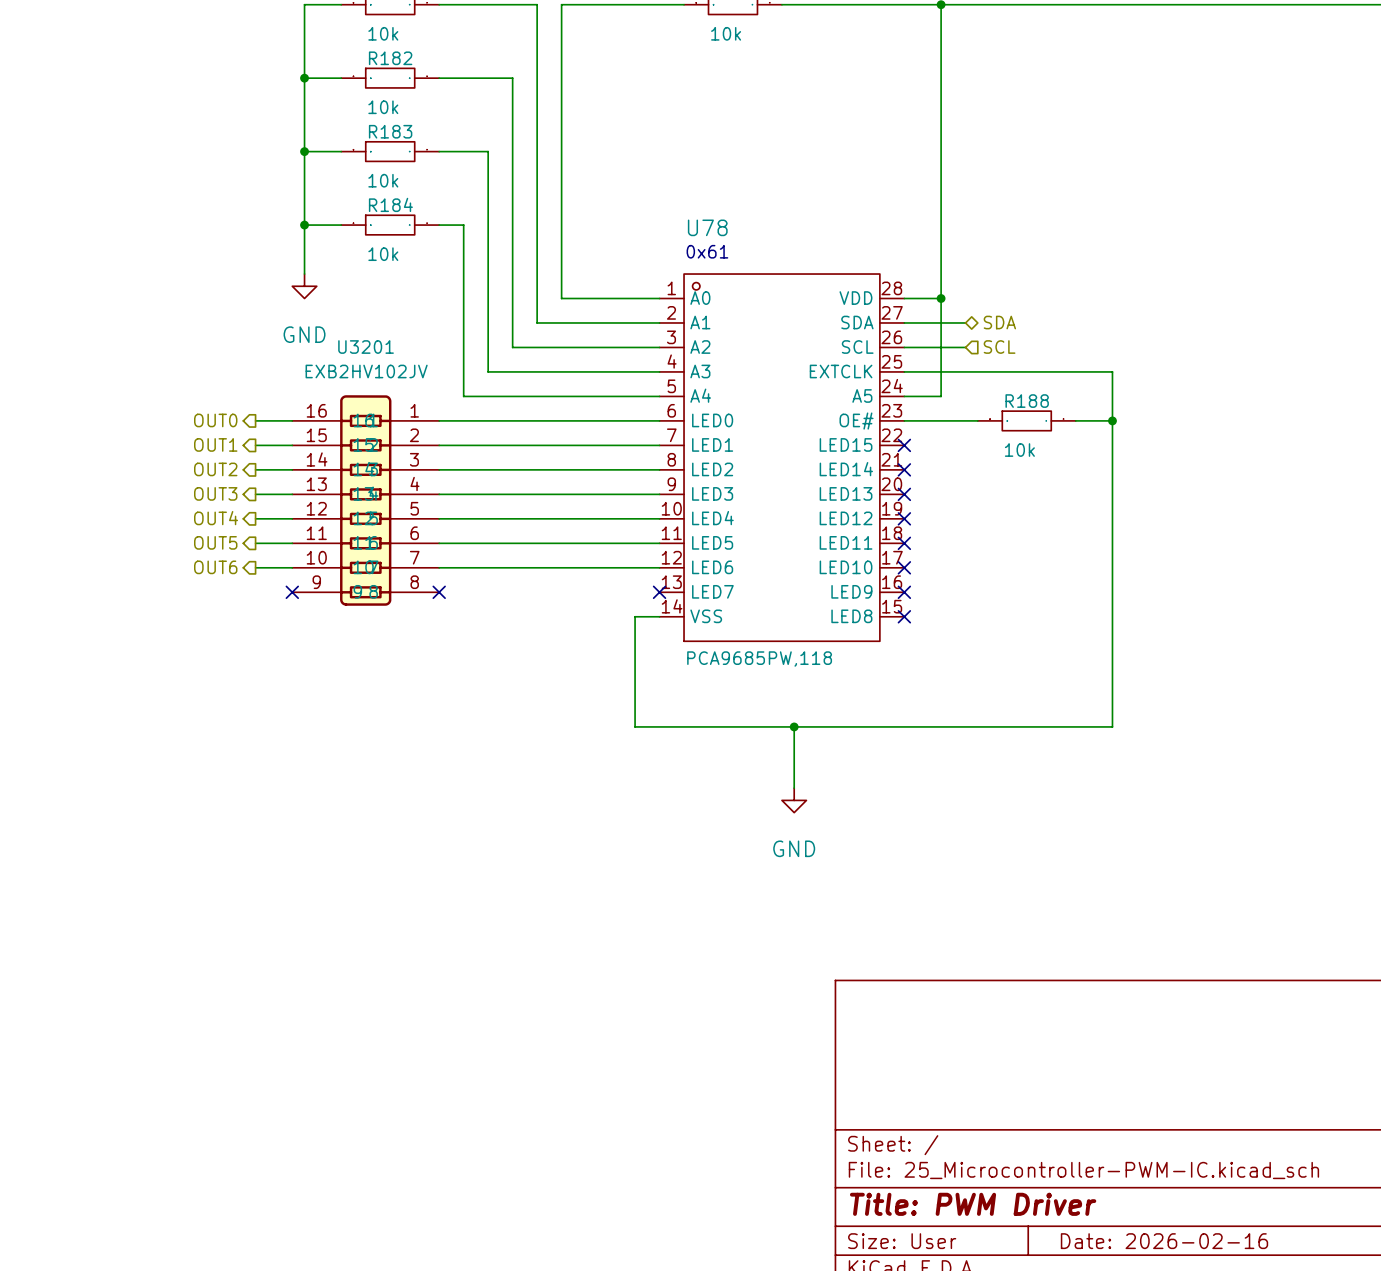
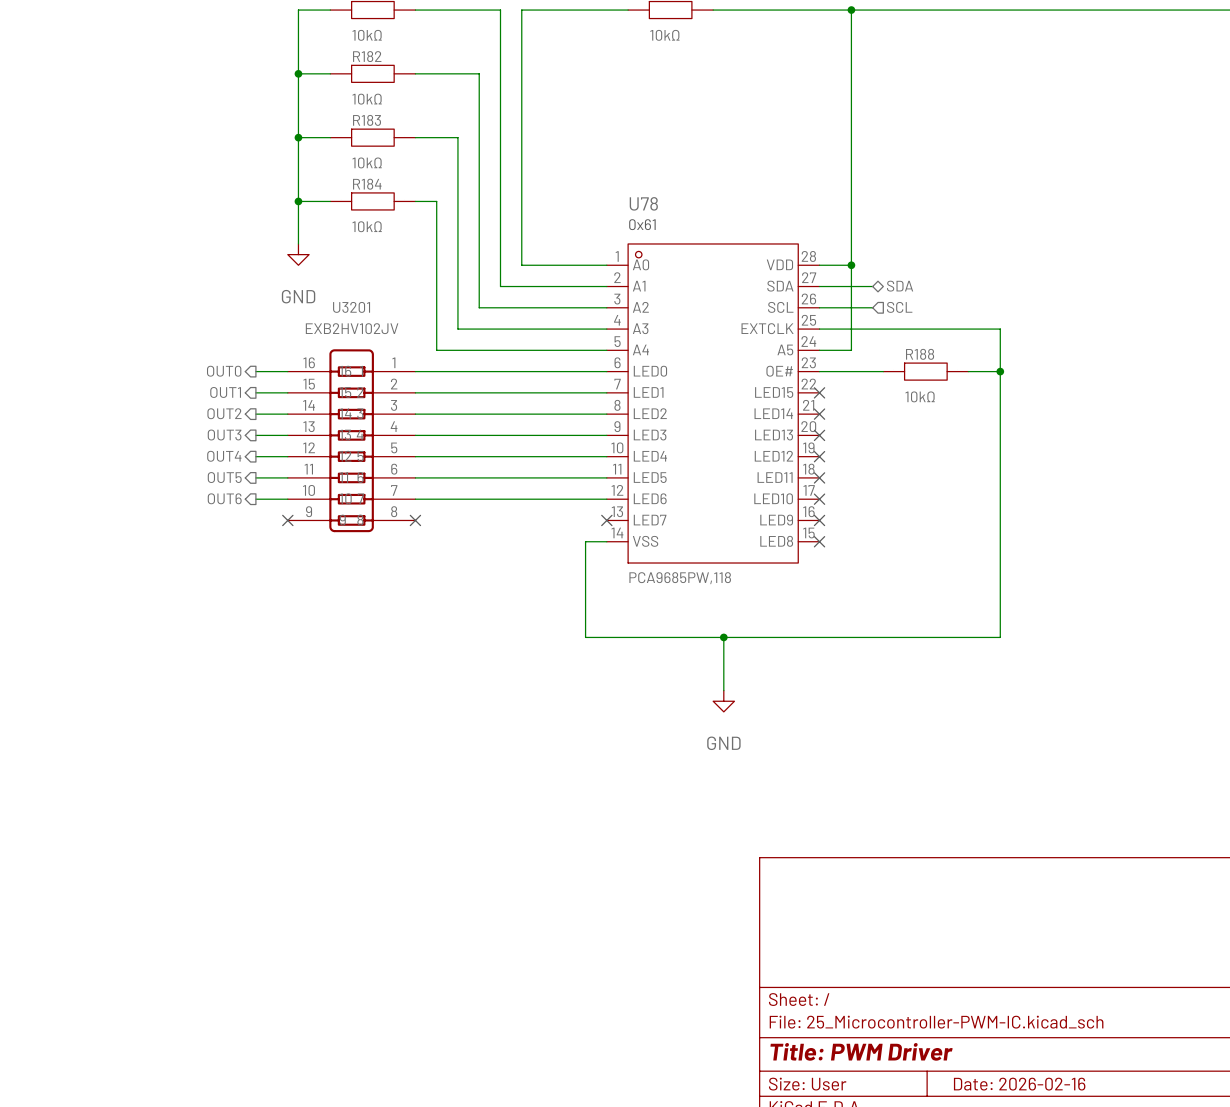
part value: 10k (383, 33) -> 10kΩ (367, 35)
part value: 10k (726, 33) -> 10kΩ (664, 35)
R182 value: 10k (383, 107) -> 10kΩ (367, 99)
R183 value: 10k (383, 180) -> 10kΩ (367, 162)
R184 value: 10k (383, 254) -> 10kΩ (367, 226)
R188 value: 10k (1019, 450) -> 10kΩ (920, 396)

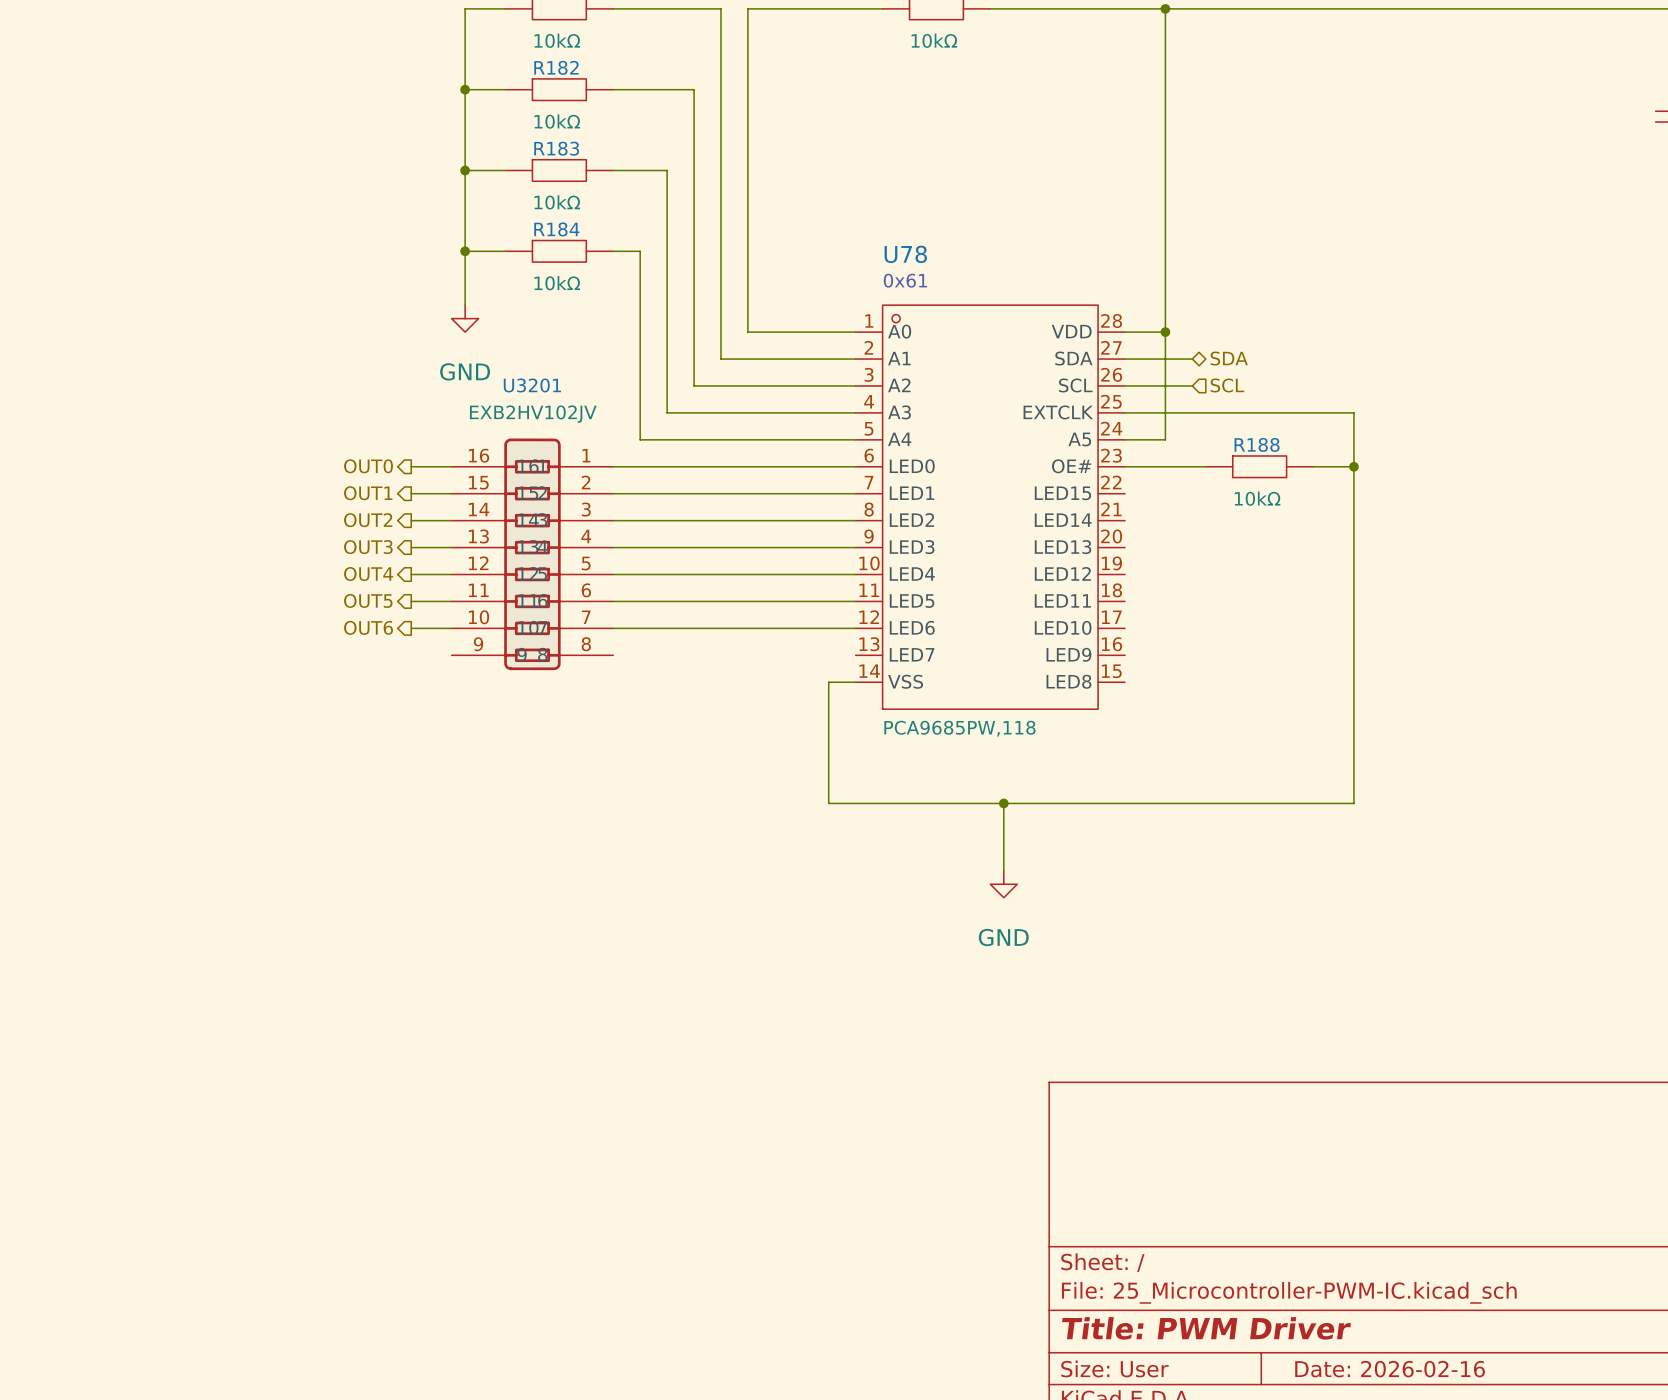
no-connect mark: (819, 392) -> none
no-connect mark: (819, 414) -> none
no-connect mark: (819, 435) -> none
no-connect mark: (819, 456) -> none
no-connect mark: (819, 477) -> none
no-connect mark: (819, 499) -> none
no-connect mark: (287, 520) -> none
no-connect mark: (415, 520) -> none
no-connect mark: (606, 520) -> none
no-connect mark: (819, 520) -> none
no-connect mark: (819, 541) -> none

